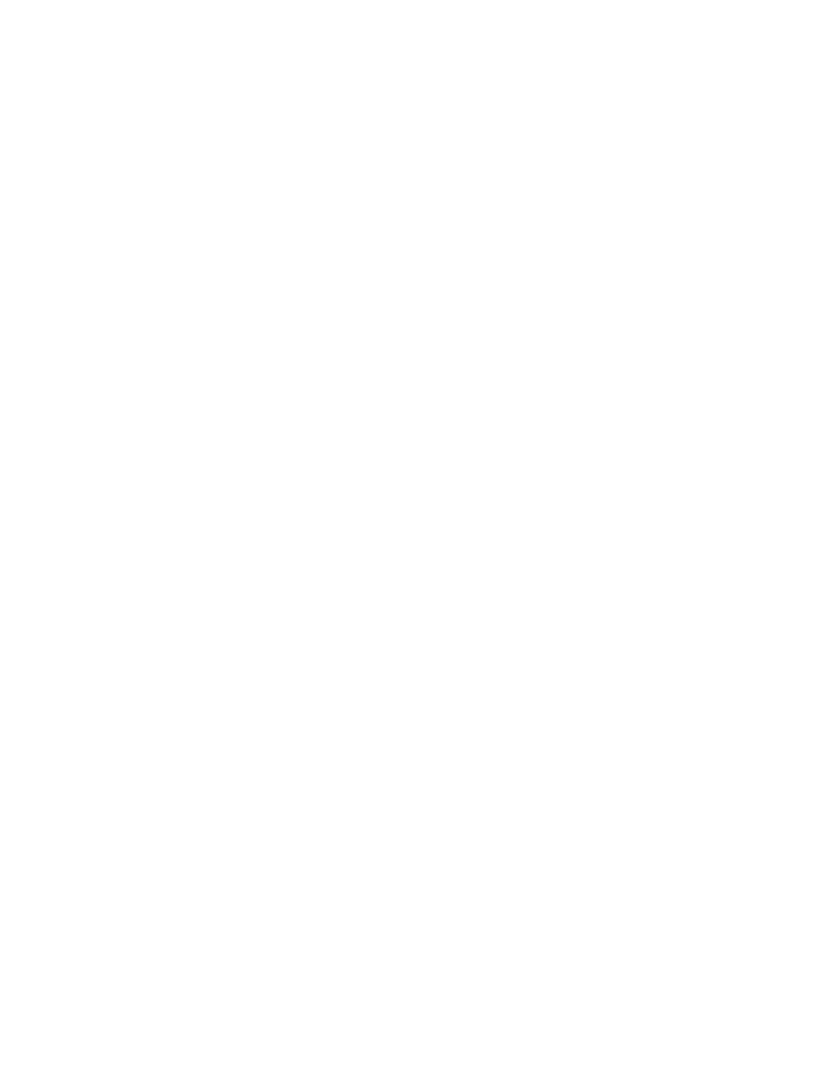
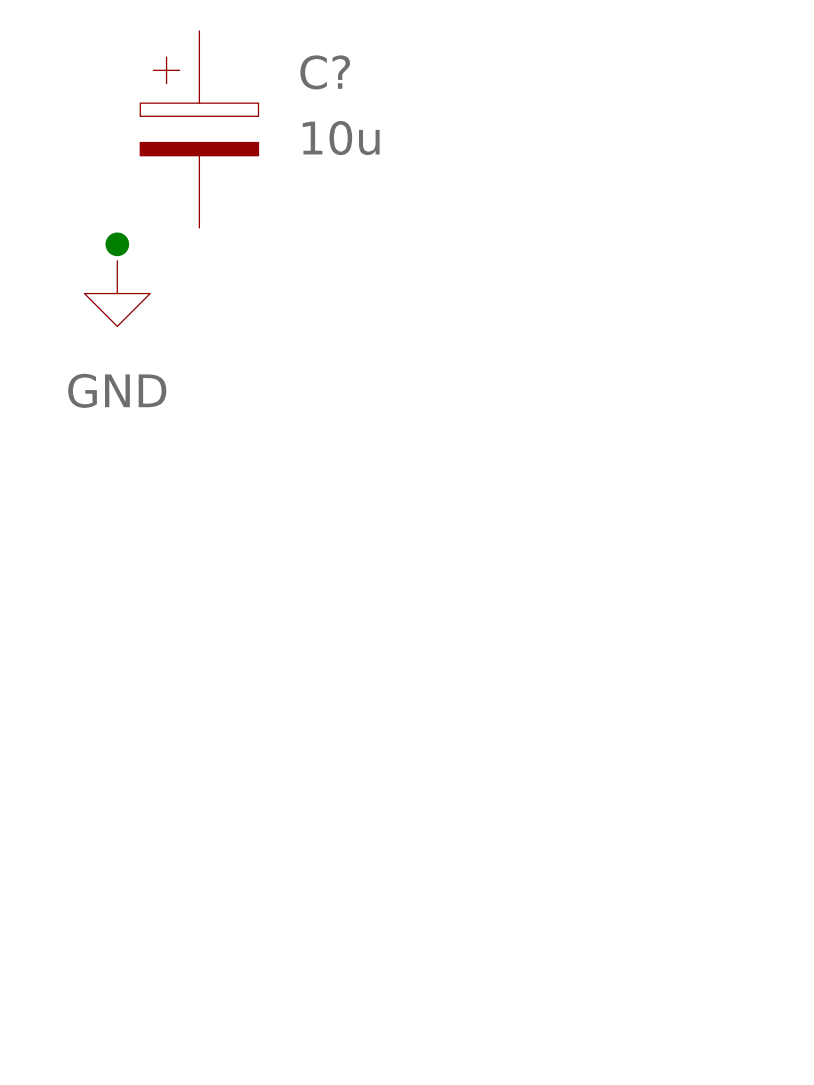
C?: none -> 10u (199, 129)
junction: none -> (117, 244)
power symbol: none -> GND (117, 293)

